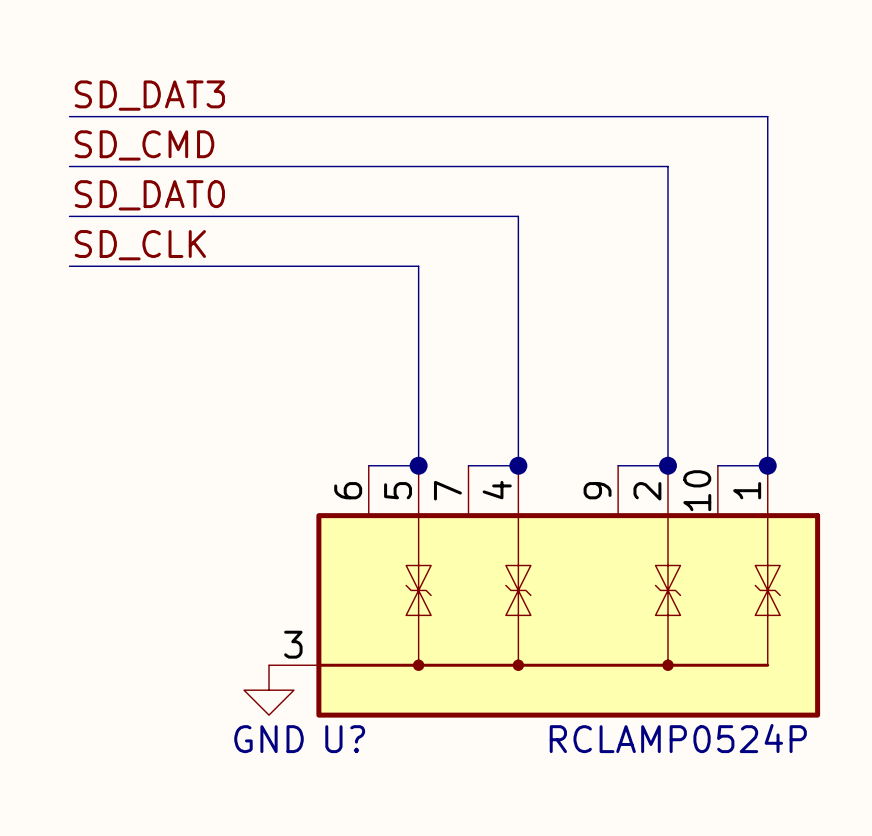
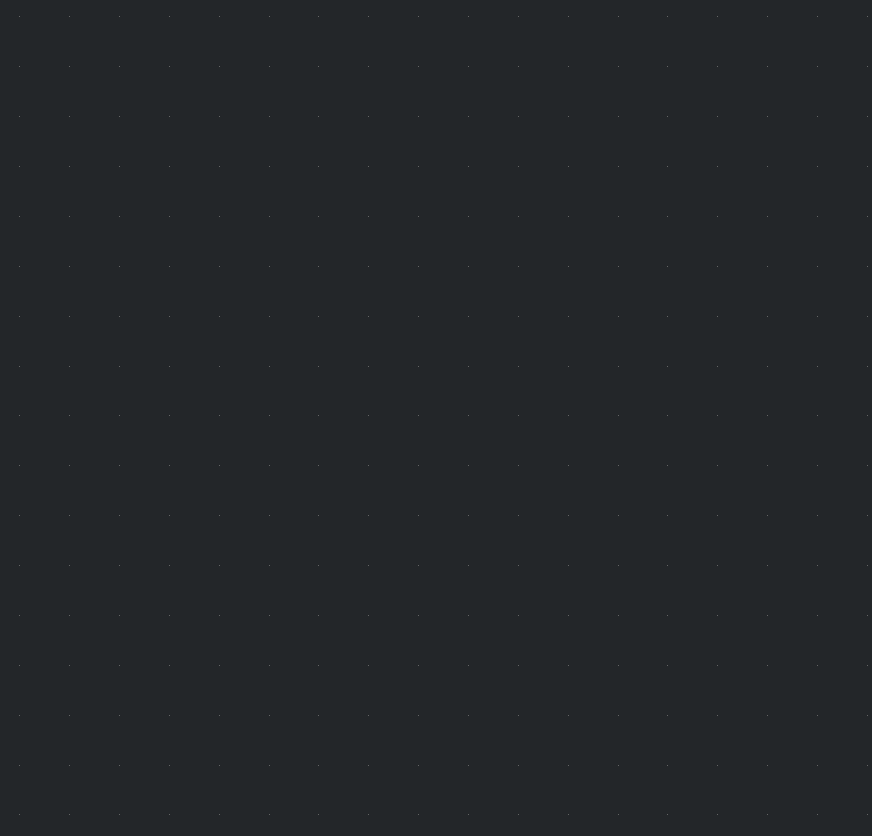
label: SD_DAT3 (149, 95) -> none
wire: (69, 116) (767, 116) (767, 465) (717, 465) -> none
label: SD_CMD (144, 145) -> none
wire: (69, 166) (667, 166) (667, 465) (618, 465) -> none
label: SD_DAT0 (149, 195) -> none
wire: (69, 216) (518, 216) (518, 465) (468, 465) -> none
label: SD_CLK (140, 245) -> none
wire: (69, 266) (418, 266) (418, 465) (368, 465) -> none
junction: (418, 465) -> none
junction: (518, 465) -> none
junction: (667, 465) -> none
junction: (767, 465) -> none
U?: RCLAMP0524P (544, 591) -> none
power symbol: GND (269, 690) -> none

